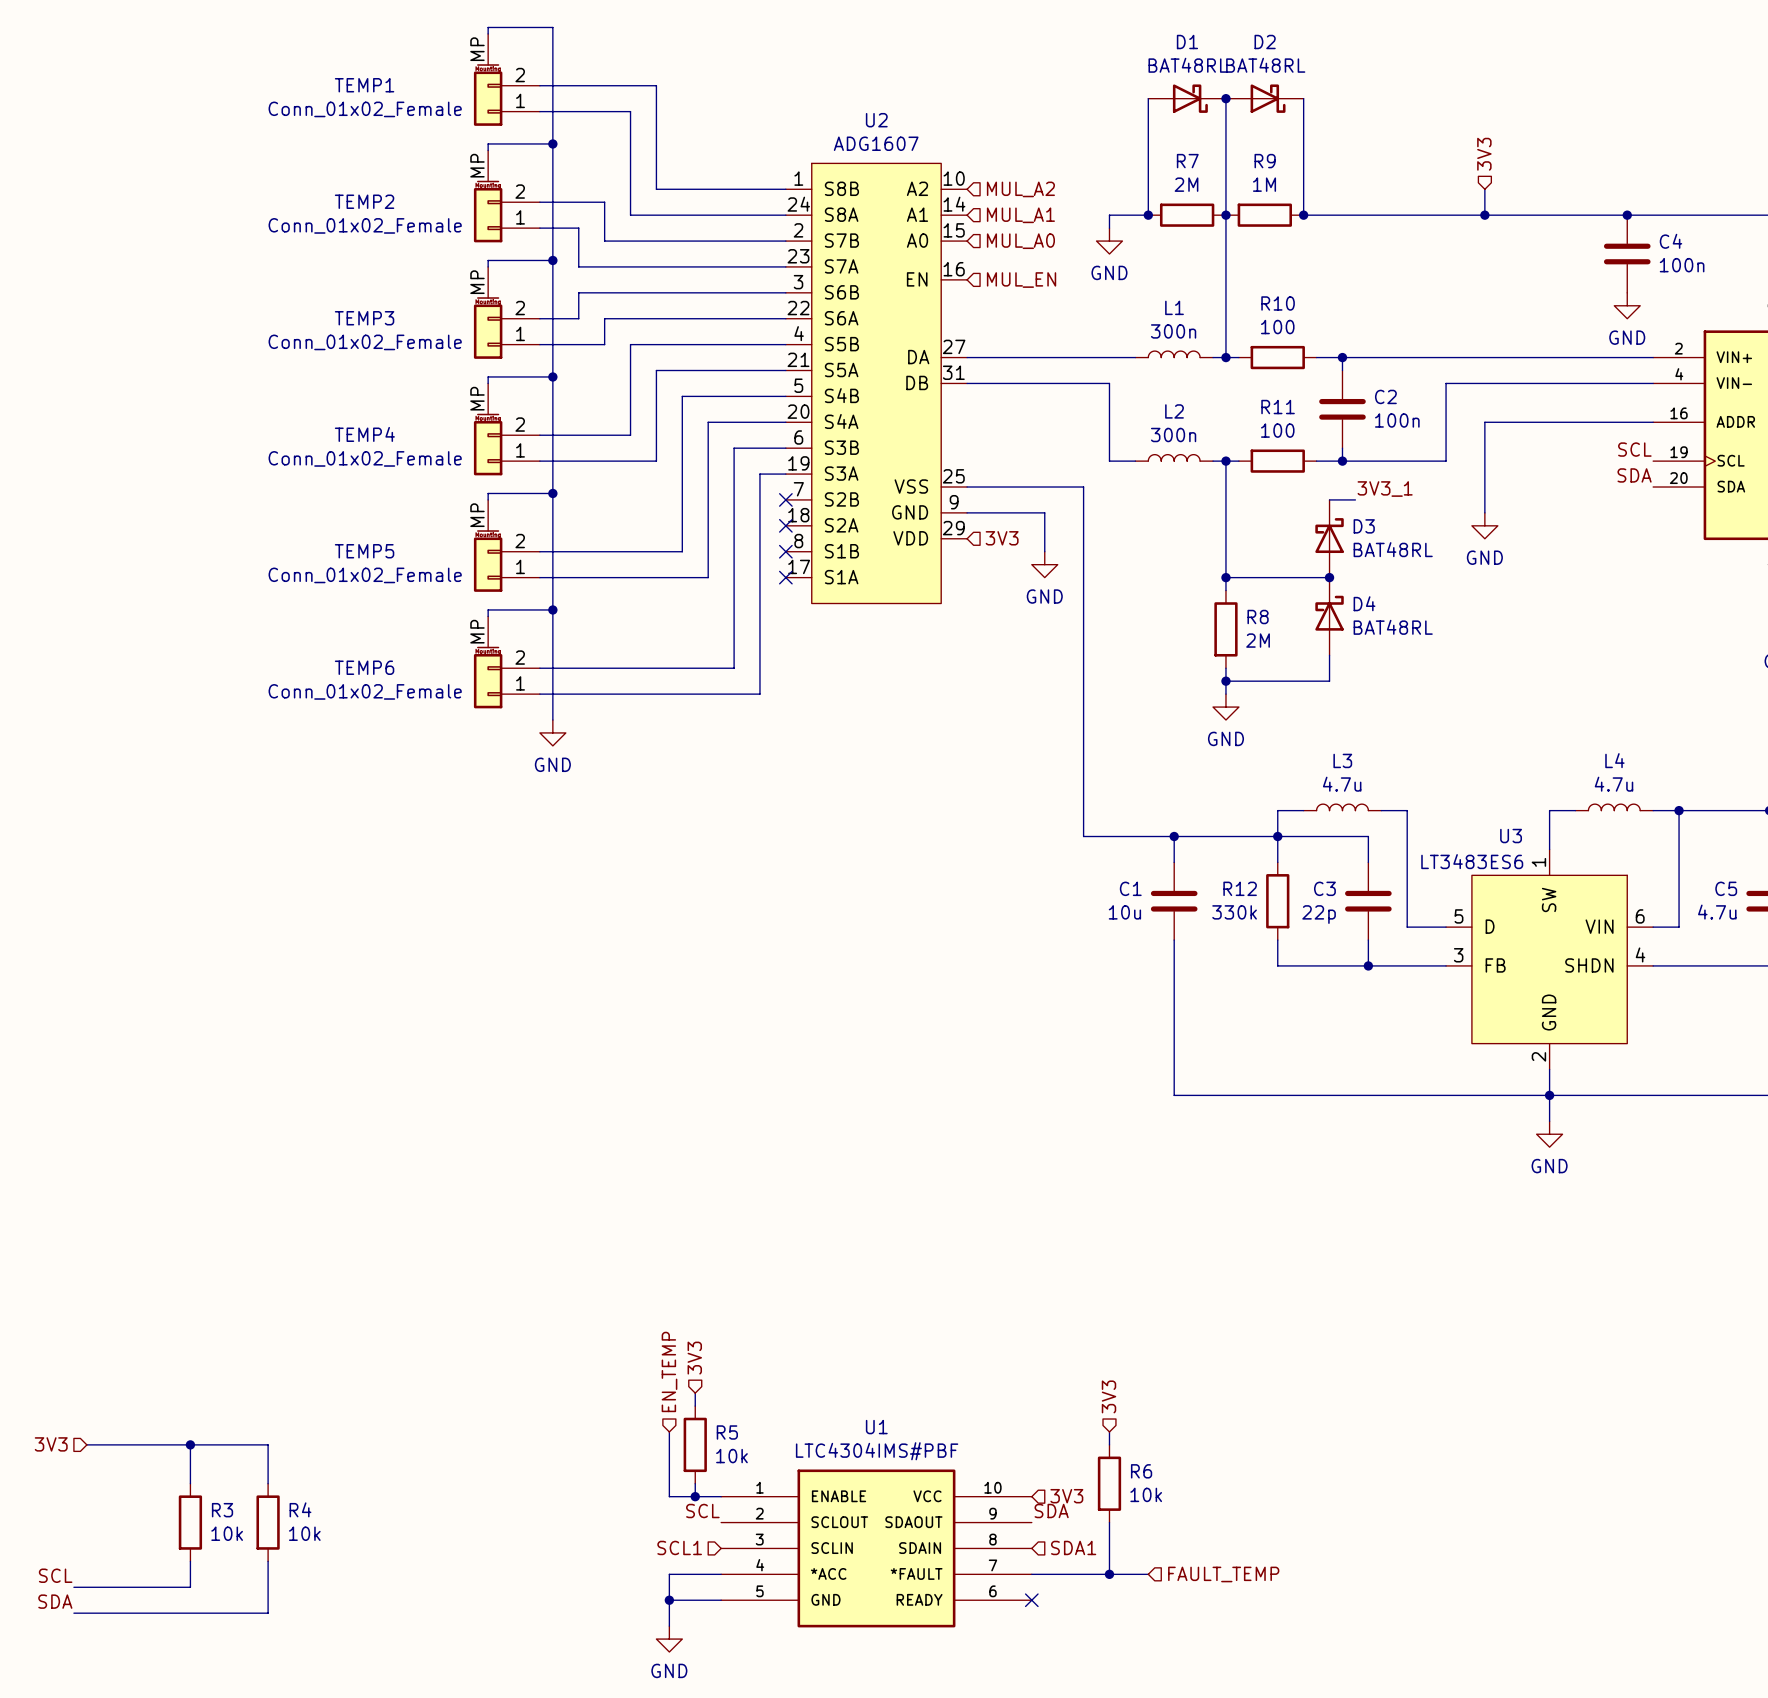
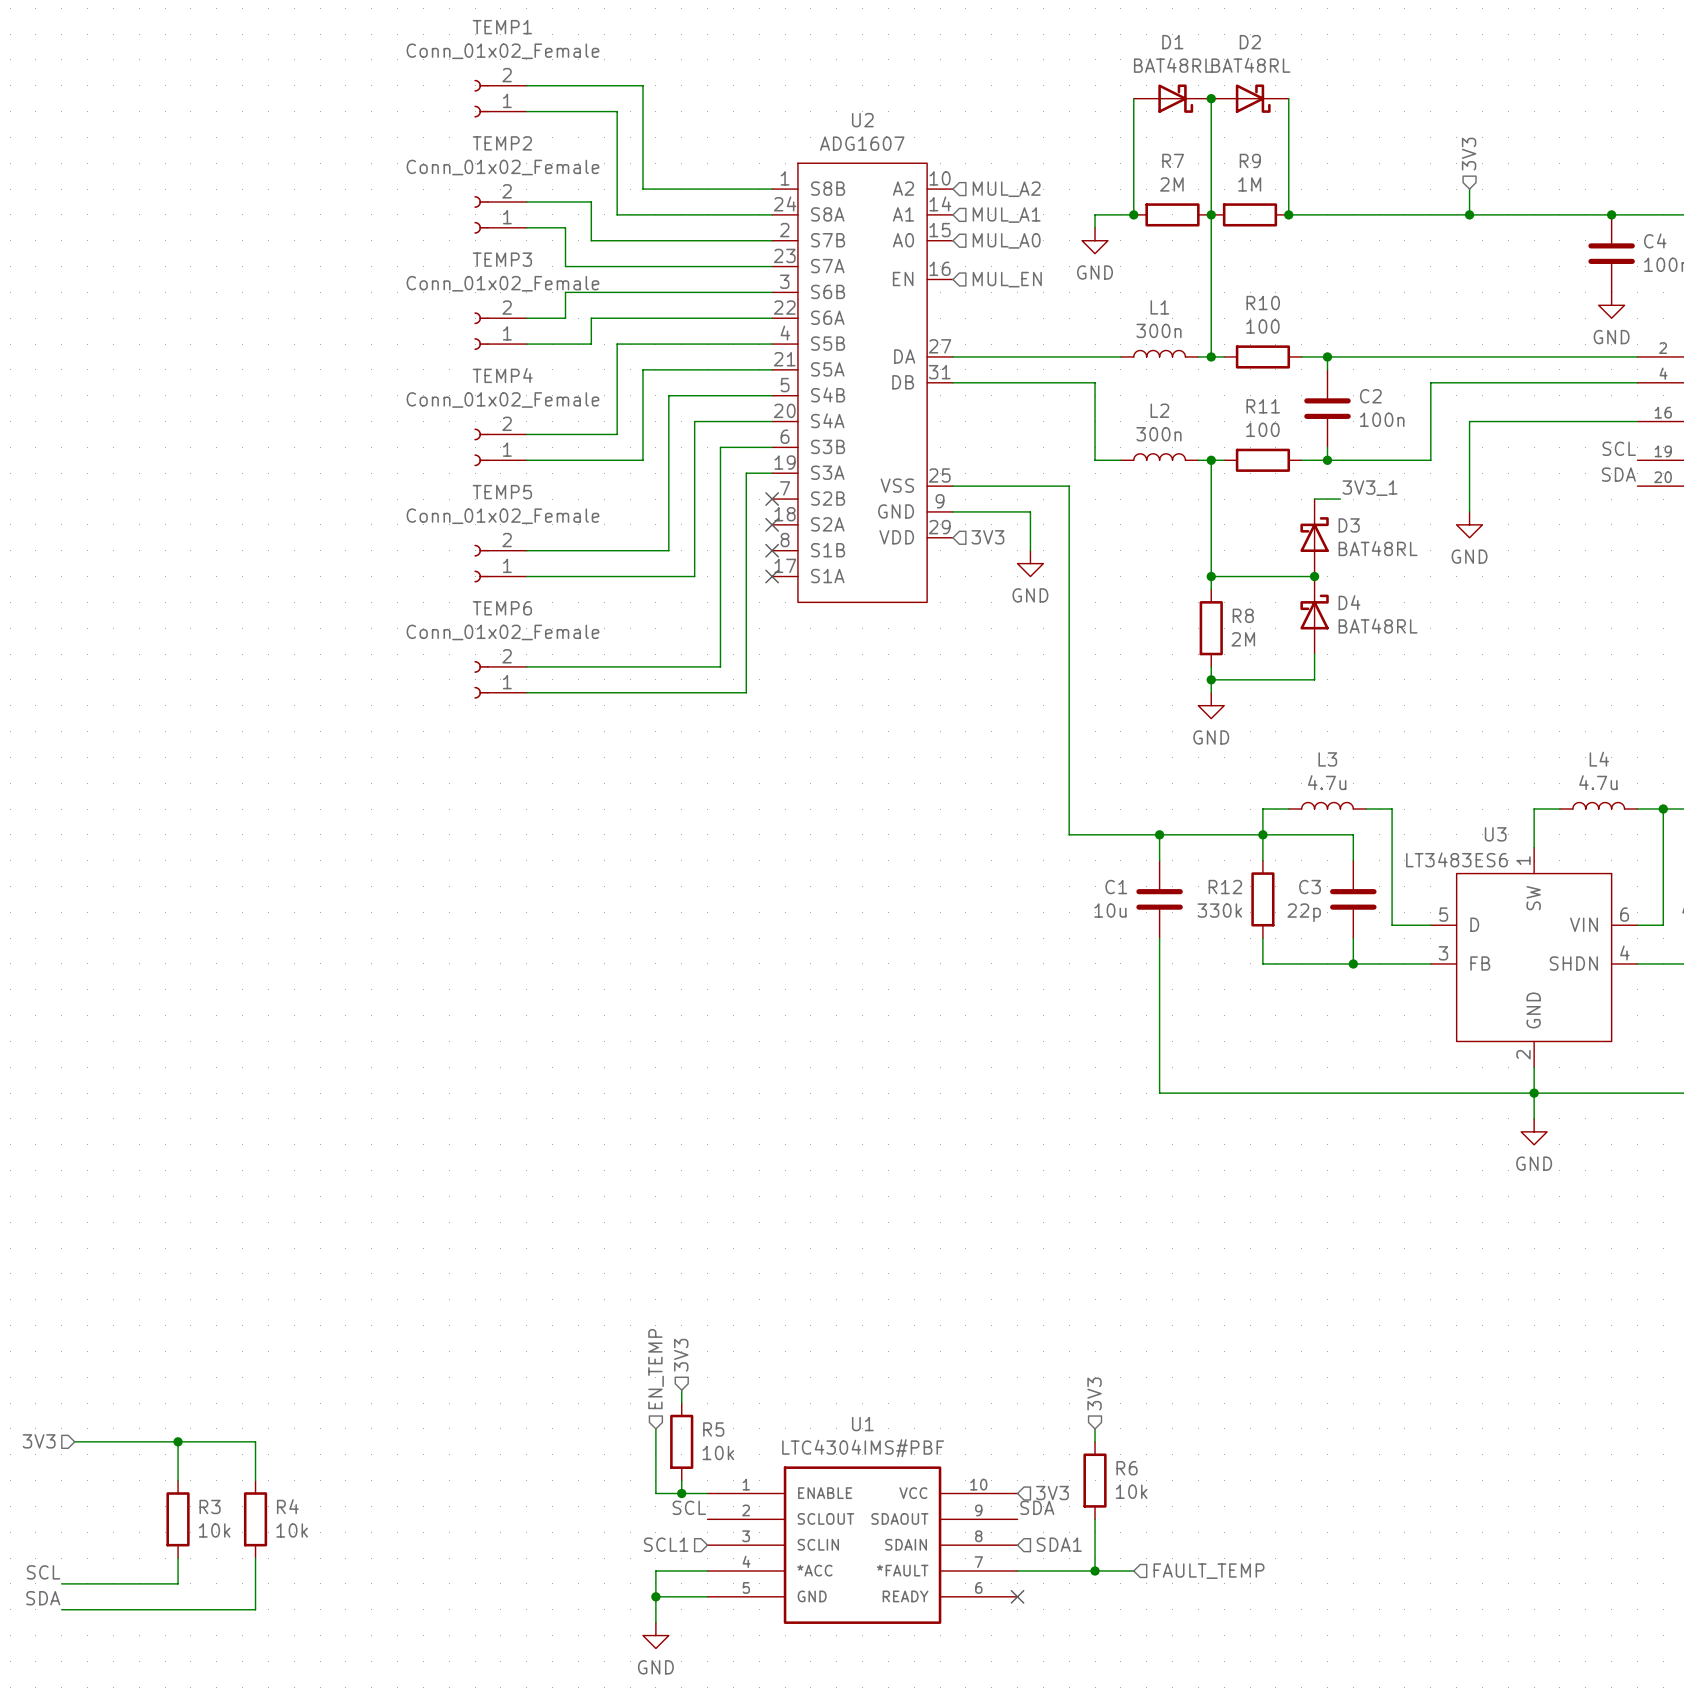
TEMP1 symbol: [473, 33, 540, 126] -> [474, 79, 527, 118]
wire: (488, 33) (488, 27) (552, 27) (552, 720) -> none
TEMP1 name position: TEMP1 (364, 85) -> TEMP1 (502, 27)
TEMP1 value position: Conn_01x02_Female (365, 109) -> Conn_01x02_Female (502, 51)
wire: (552, 143) (488, 143) (488, 150) -> none
junction: (552, 143) -> none
TEMP2 symbol: [473, 150, 540, 243] -> [474, 196, 527, 234]
TEMP2 name position: TEMP2 (364, 201) -> TEMP2 (502, 143)
TEMP2 value position: Conn_01x02_Female (365, 225) -> Conn_01x02_Female (502, 167)
wire: (552, 260) (488, 260) (488, 266) -> none
junction: (552, 260) -> none
TEMP3 symbol: [473, 266, 540, 359] -> [474, 312, 527, 350]
TEMP3 name position: TEMP3 (364, 318) -> TEMP3 (502, 259)
TEMP3 value position: Conn_01x02_Female (365, 342) -> Conn_01x02_Female (502, 283)
wire: (552, 376) (488, 376) (488, 383) -> none
junction: (552, 376) -> none
TEMP4 symbol: [473, 383, 540, 476] -> [474, 428, 527, 467]
TEMP4 name position: TEMP4 (364, 434) -> TEMP4 (502, 375)
TEMP4 value position: Conn_01x02_Female (365, 458) -> Conn_01x02_Female (502, 399)
wire: (552, 493) (488, 493) (488, 499) -> none
junction: (552, 493) -> none
TEMP5 symbol: [473, 499, 540, 592] -> [474, 544, 527, 583]
TEMP5 name position: TEMP5 (364, 551) -> TEMP5 (502, 492)
TEMP5 value position: Conn_01x02_Female (365, 575) -> Conn_01x02_Female (502, 516)
wire: (552, 609) (488, 609) (488, 616) -> none
junction: (552, 609) -> none
TEMP6 symbol: [473, 616, 540, 709] -> [474, 660, 527, 699]
TEMP6 name position: TEMP6 (364, 667) -> TEMP6 (502, 608)
TEMP6 value position: Conn_01x02_Female (365, 691) -> Conn_01x02_Female (502, 632)
power symbol: GND (552, 732) -> none

